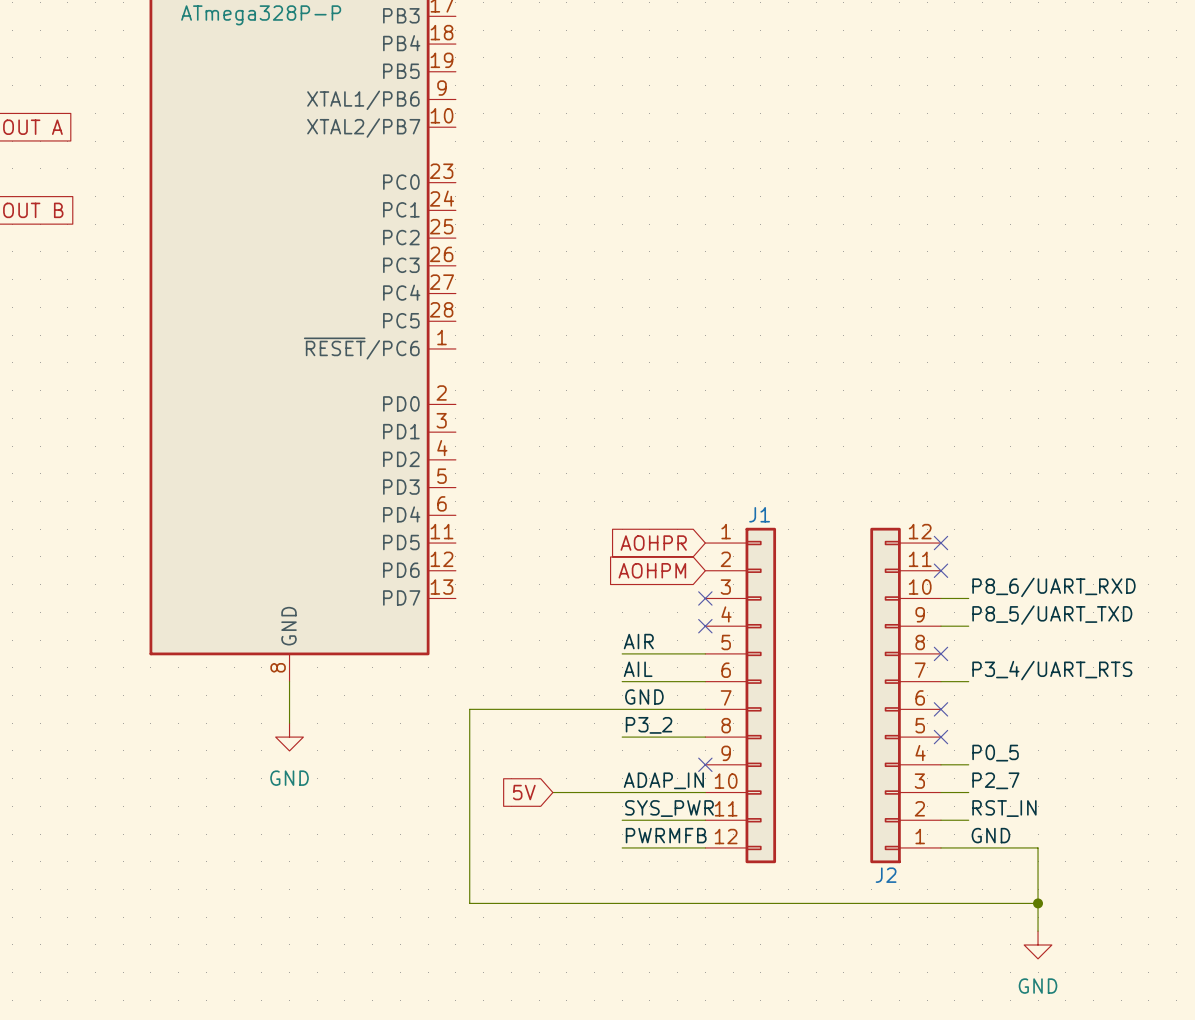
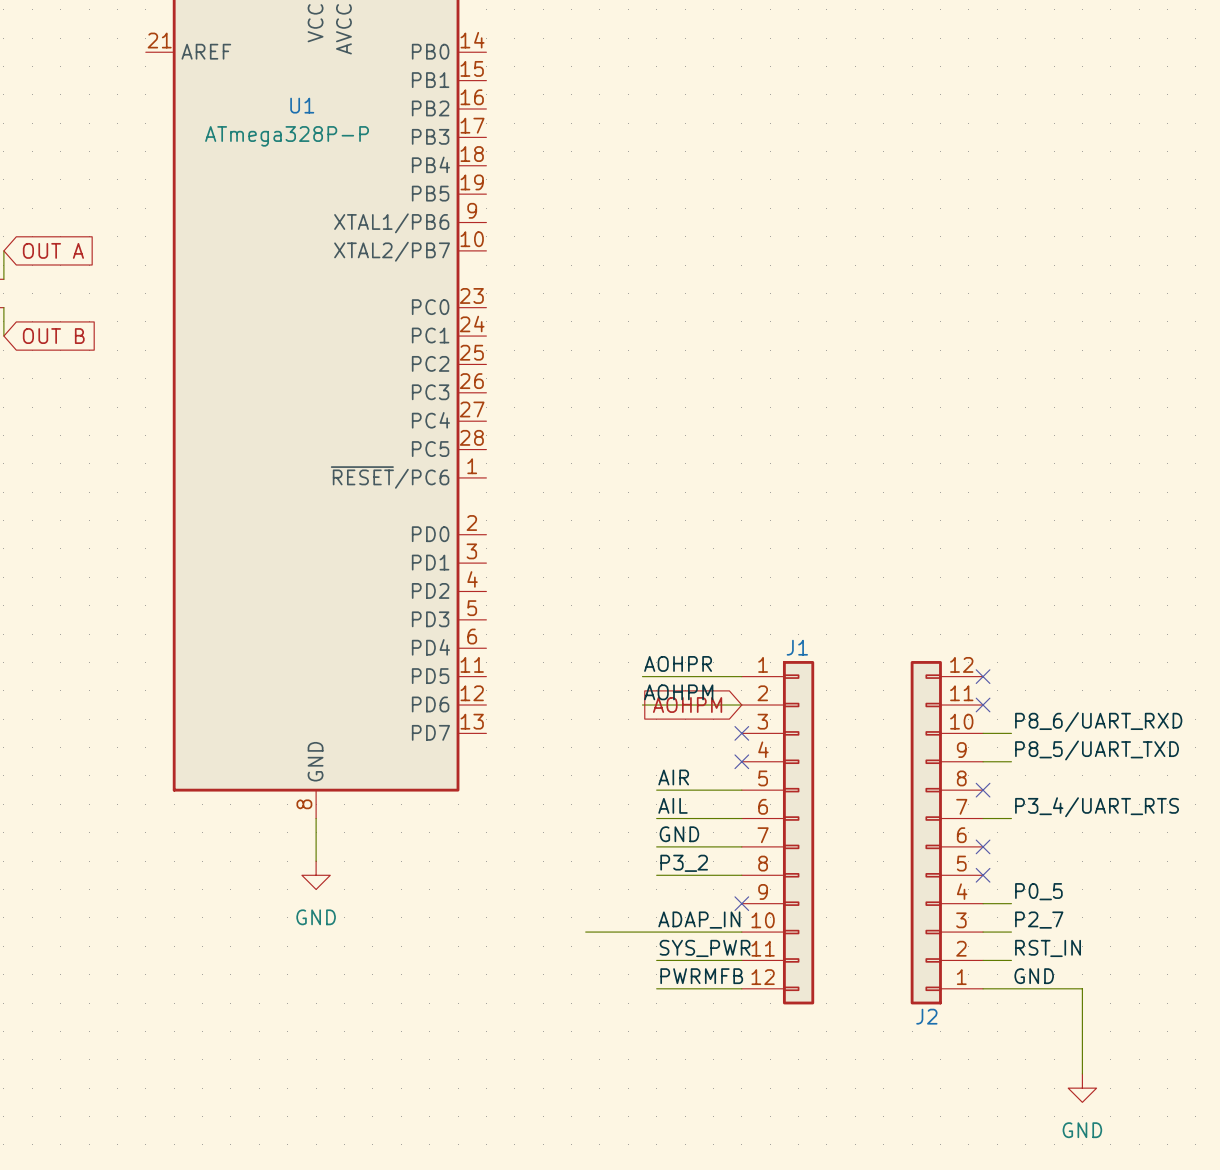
label: none -> AOHPR (678, 663)
wire: none -> (642, 676) (741, 676)
global label: AOHPR (653, 543) -> none
label: none -> AOHPM (678, 692)
wire: none -> (642, 705) (741, 705)
wire: (622, 709) (469, 709) (469, 903) (1038, 903) -> none
global label: 5V (524, 792) -> none
junction: (1038, 903) -> none

